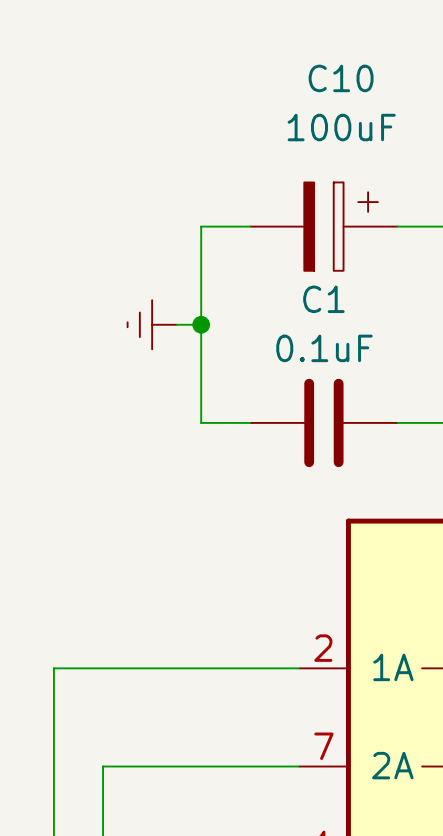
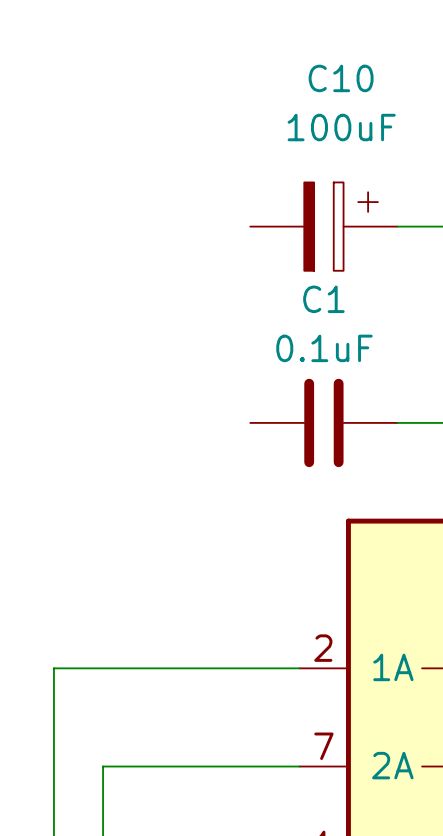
wire: (250, 226) (201, 226) (201, 422) (250, 422) -> none
power symbol: (152, 324) -> none
wire: (176, 324) (201, 324) -> none
junction: (201, 324) -> none

